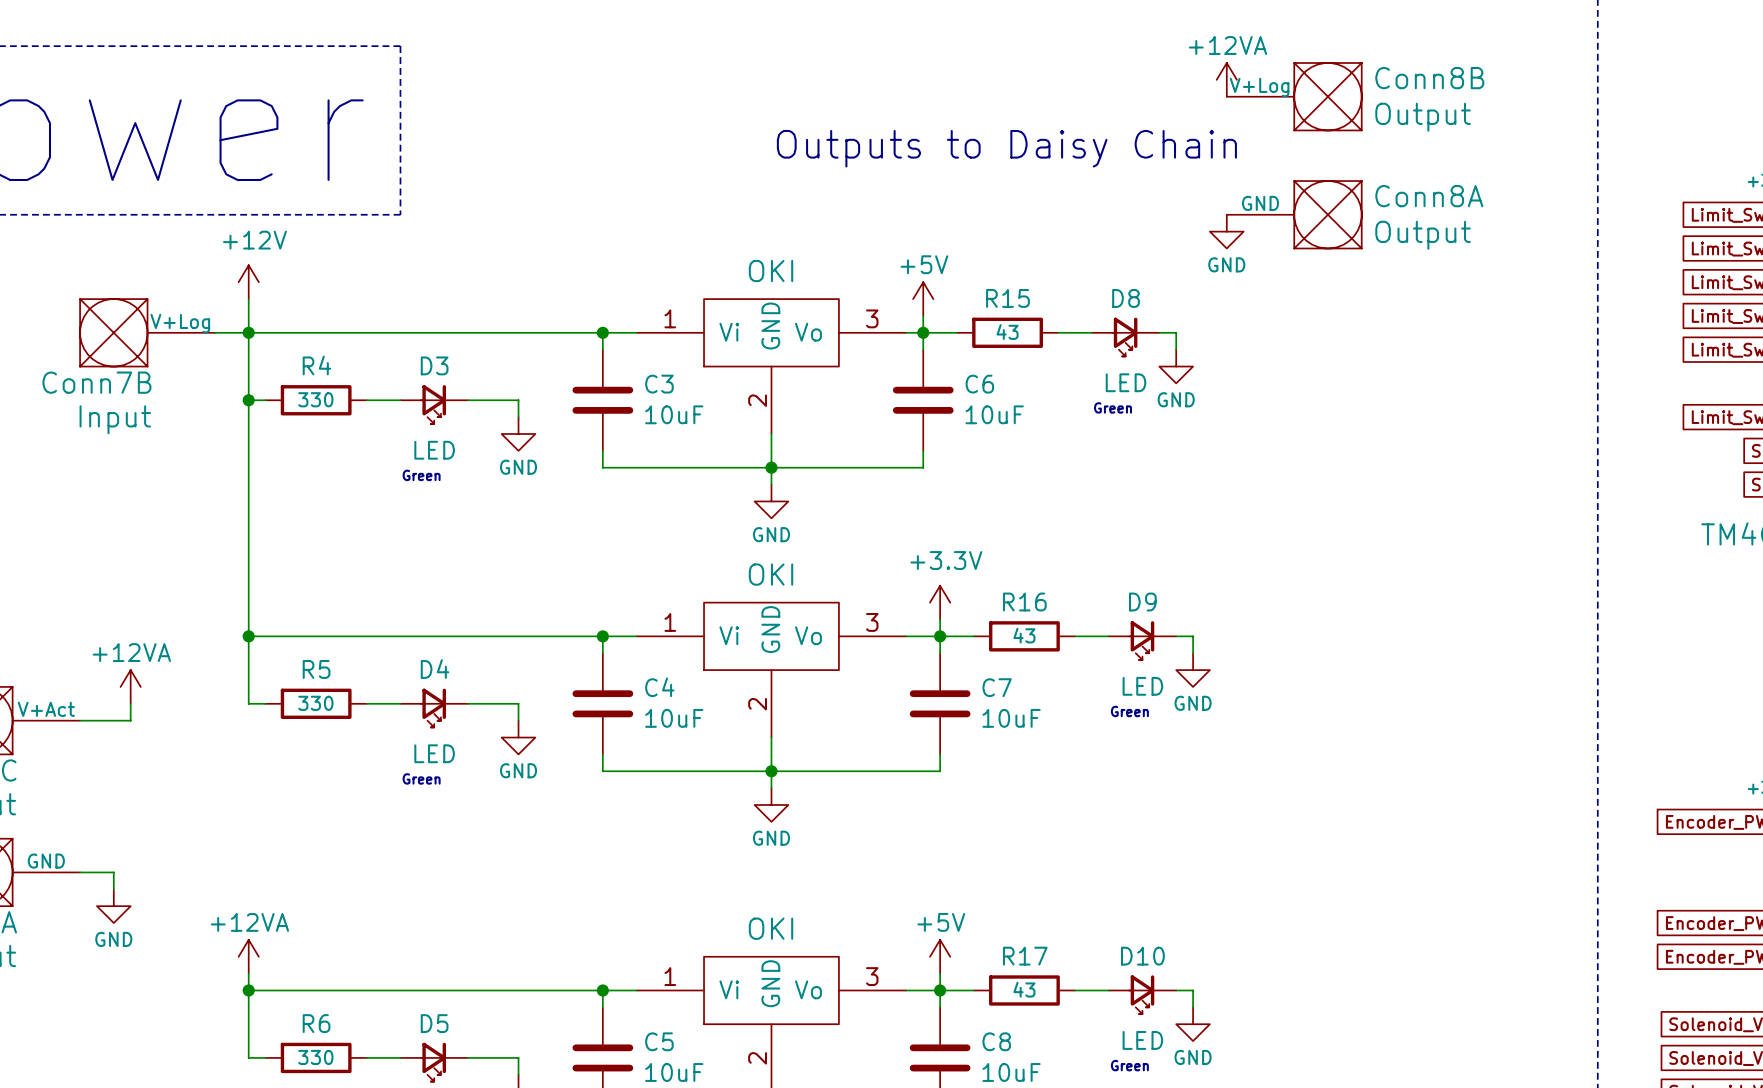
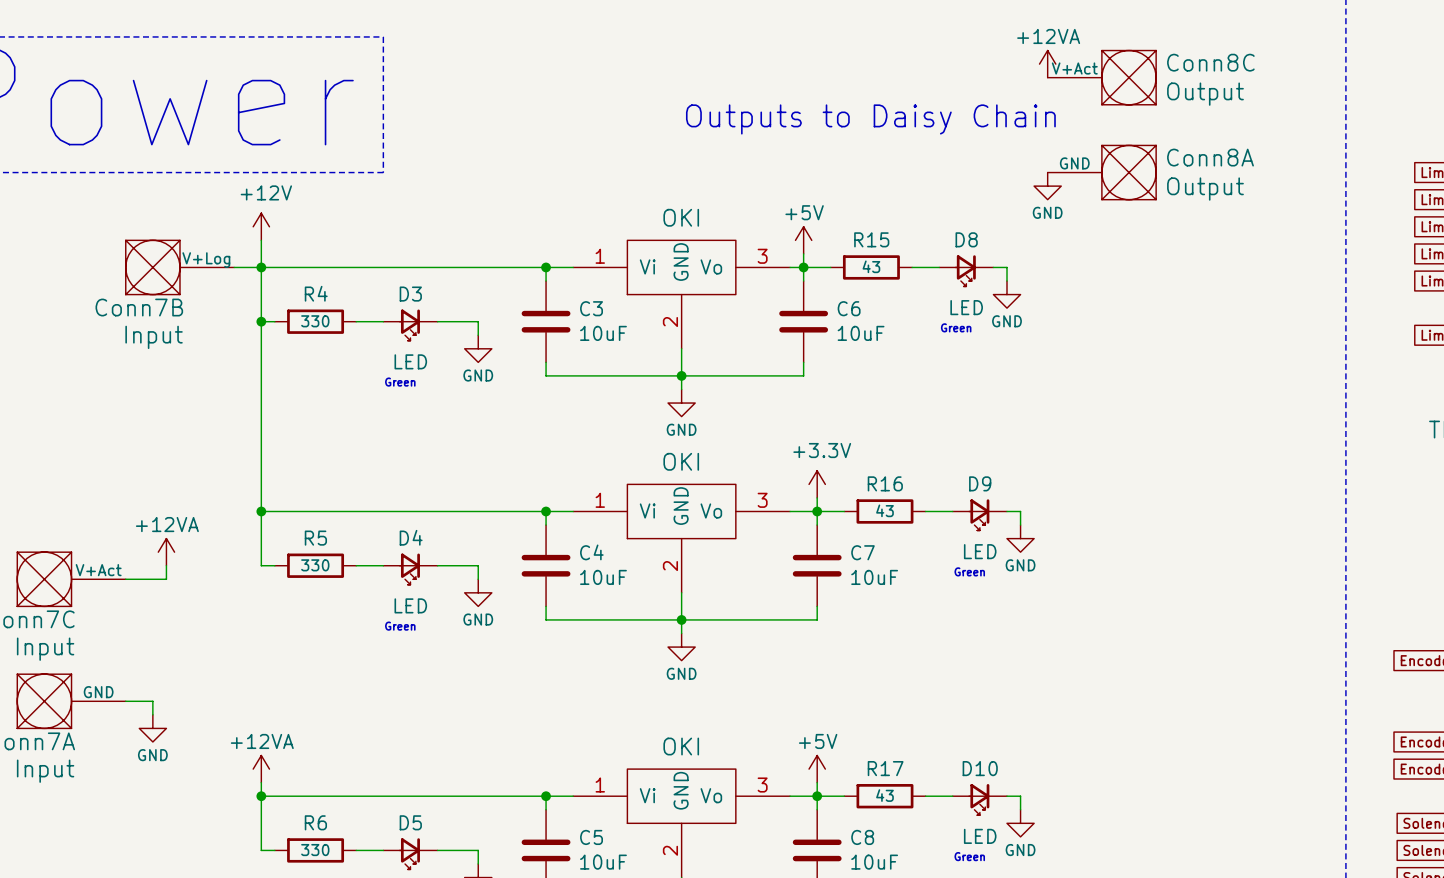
Conn8B name: Conn8B (1429, 78) -> Conn8C (1210, 62)
Conn8B pin name: V+Log (1259, 87) -> V+Act (1074, 68)

